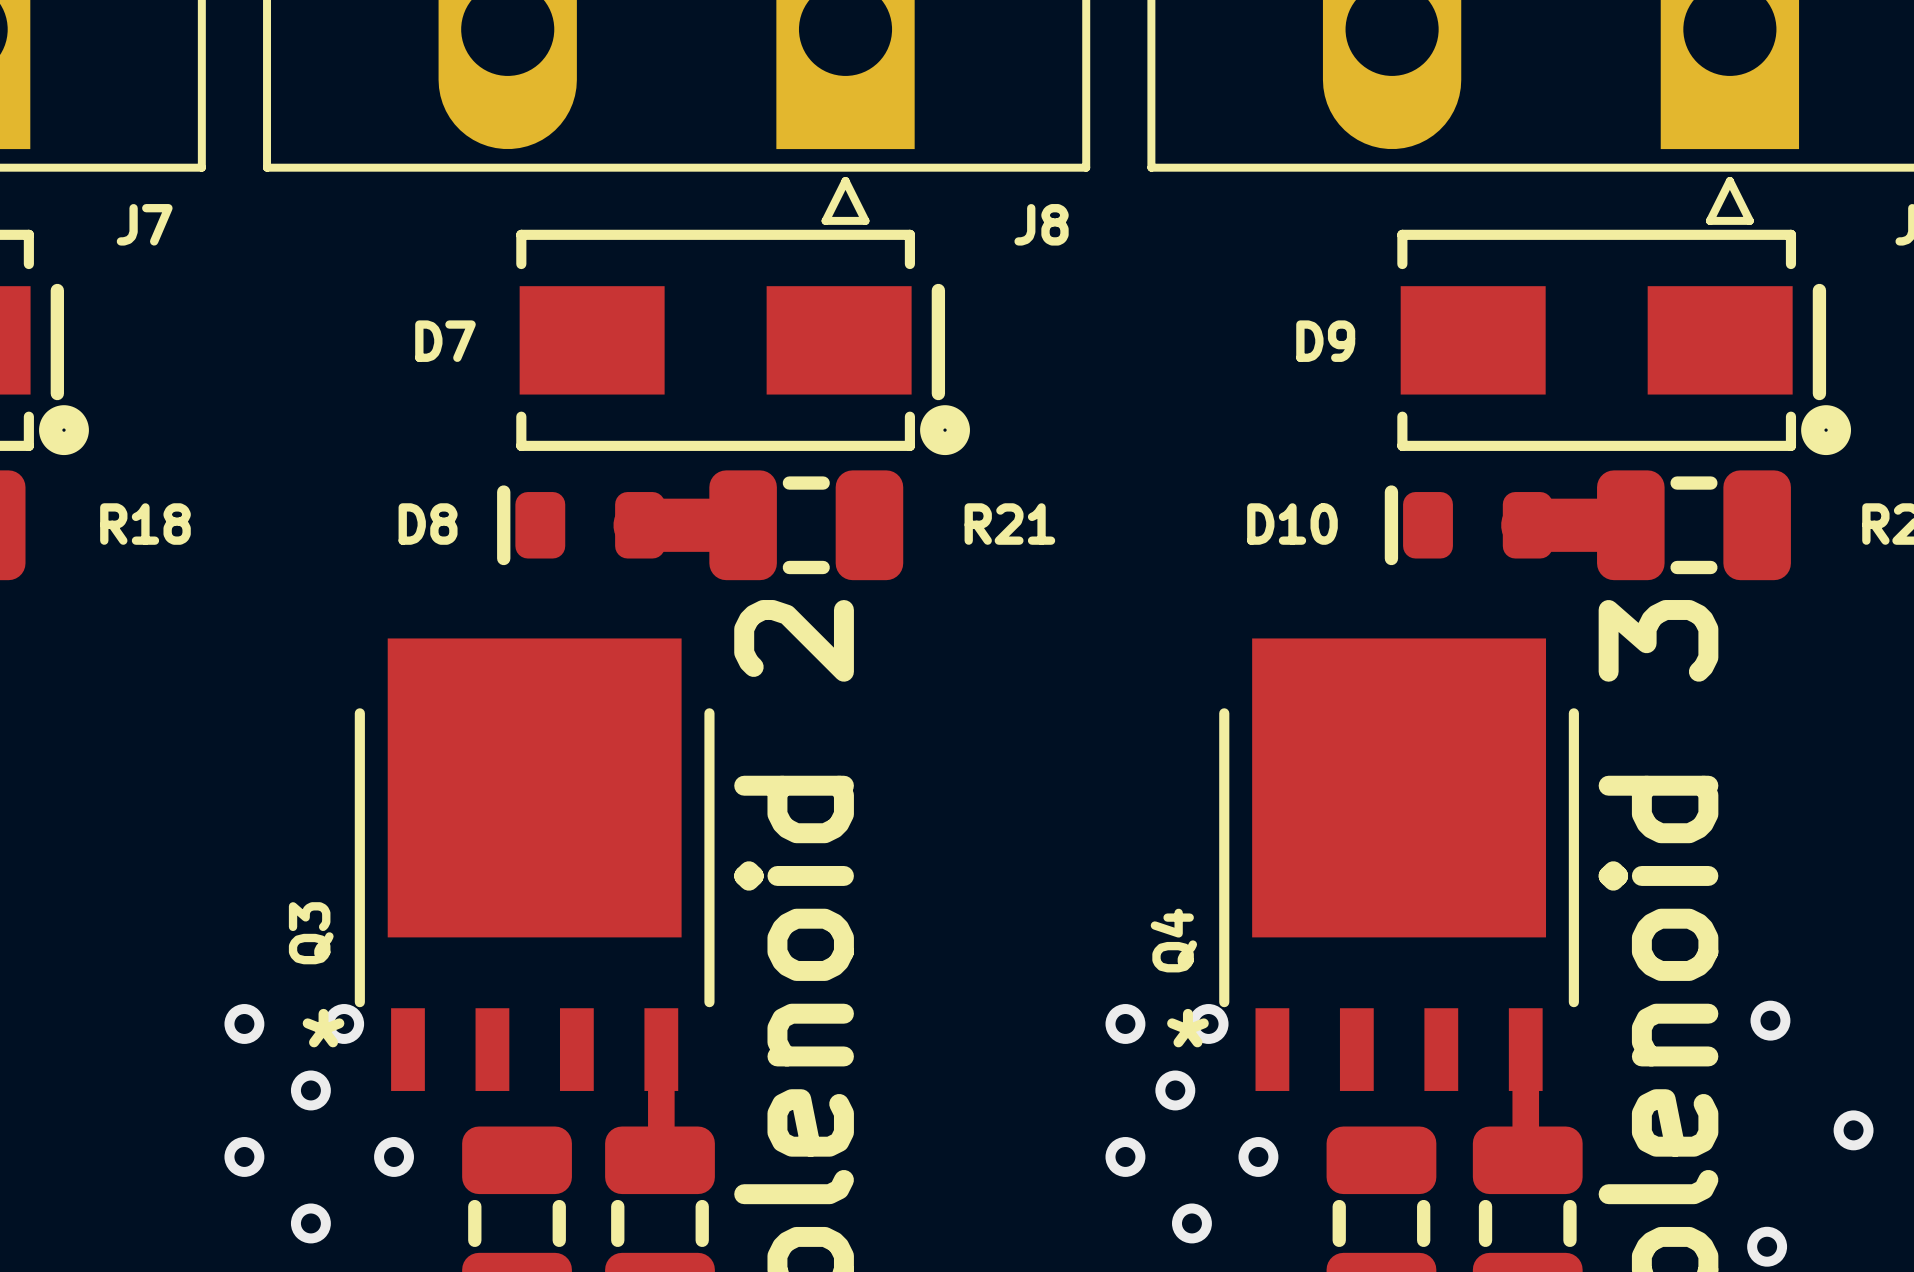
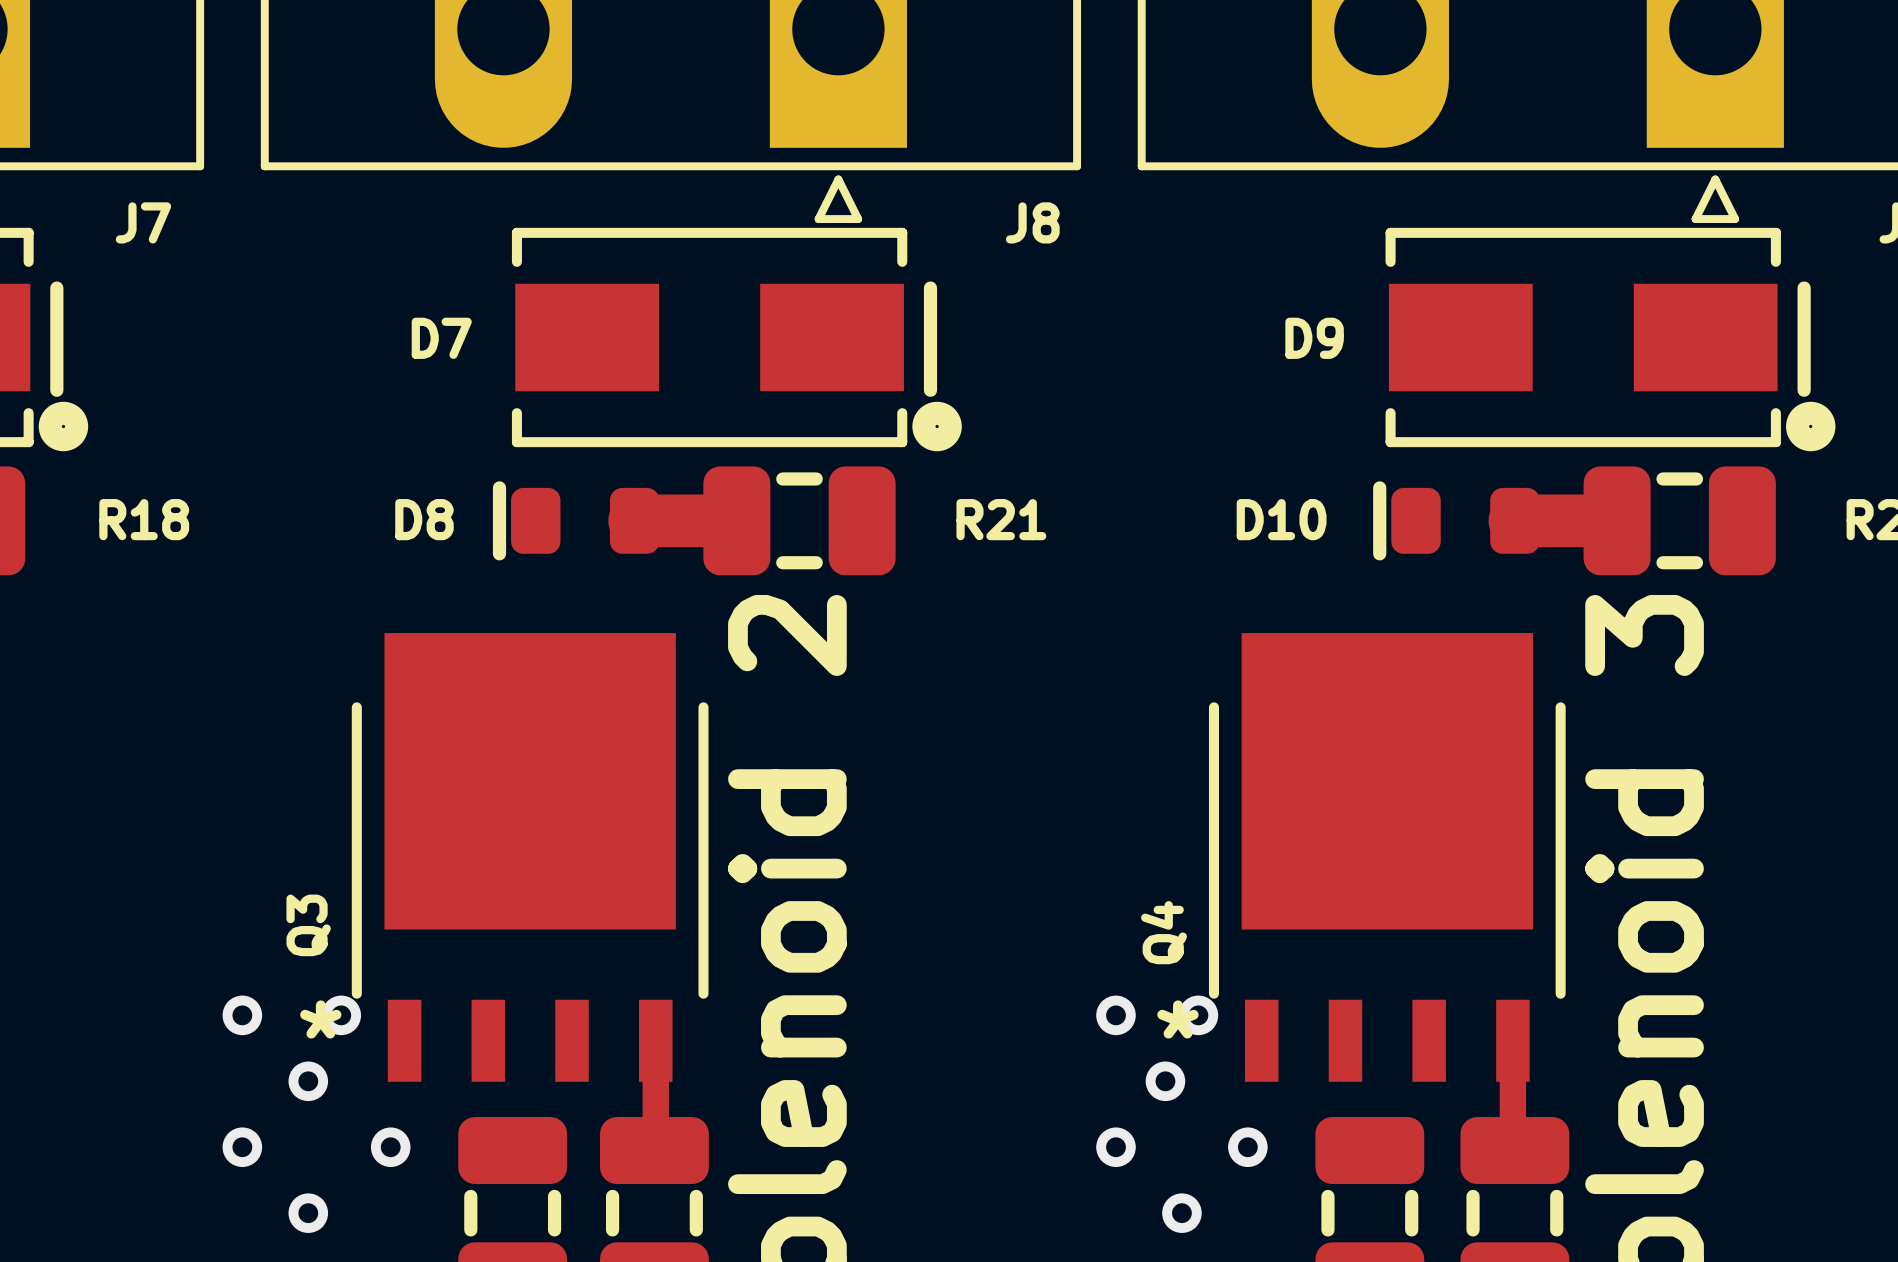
via: (1770, 1020) -> none
via: (1853, 1130) -> none
via: (1767, 1246) -> none

